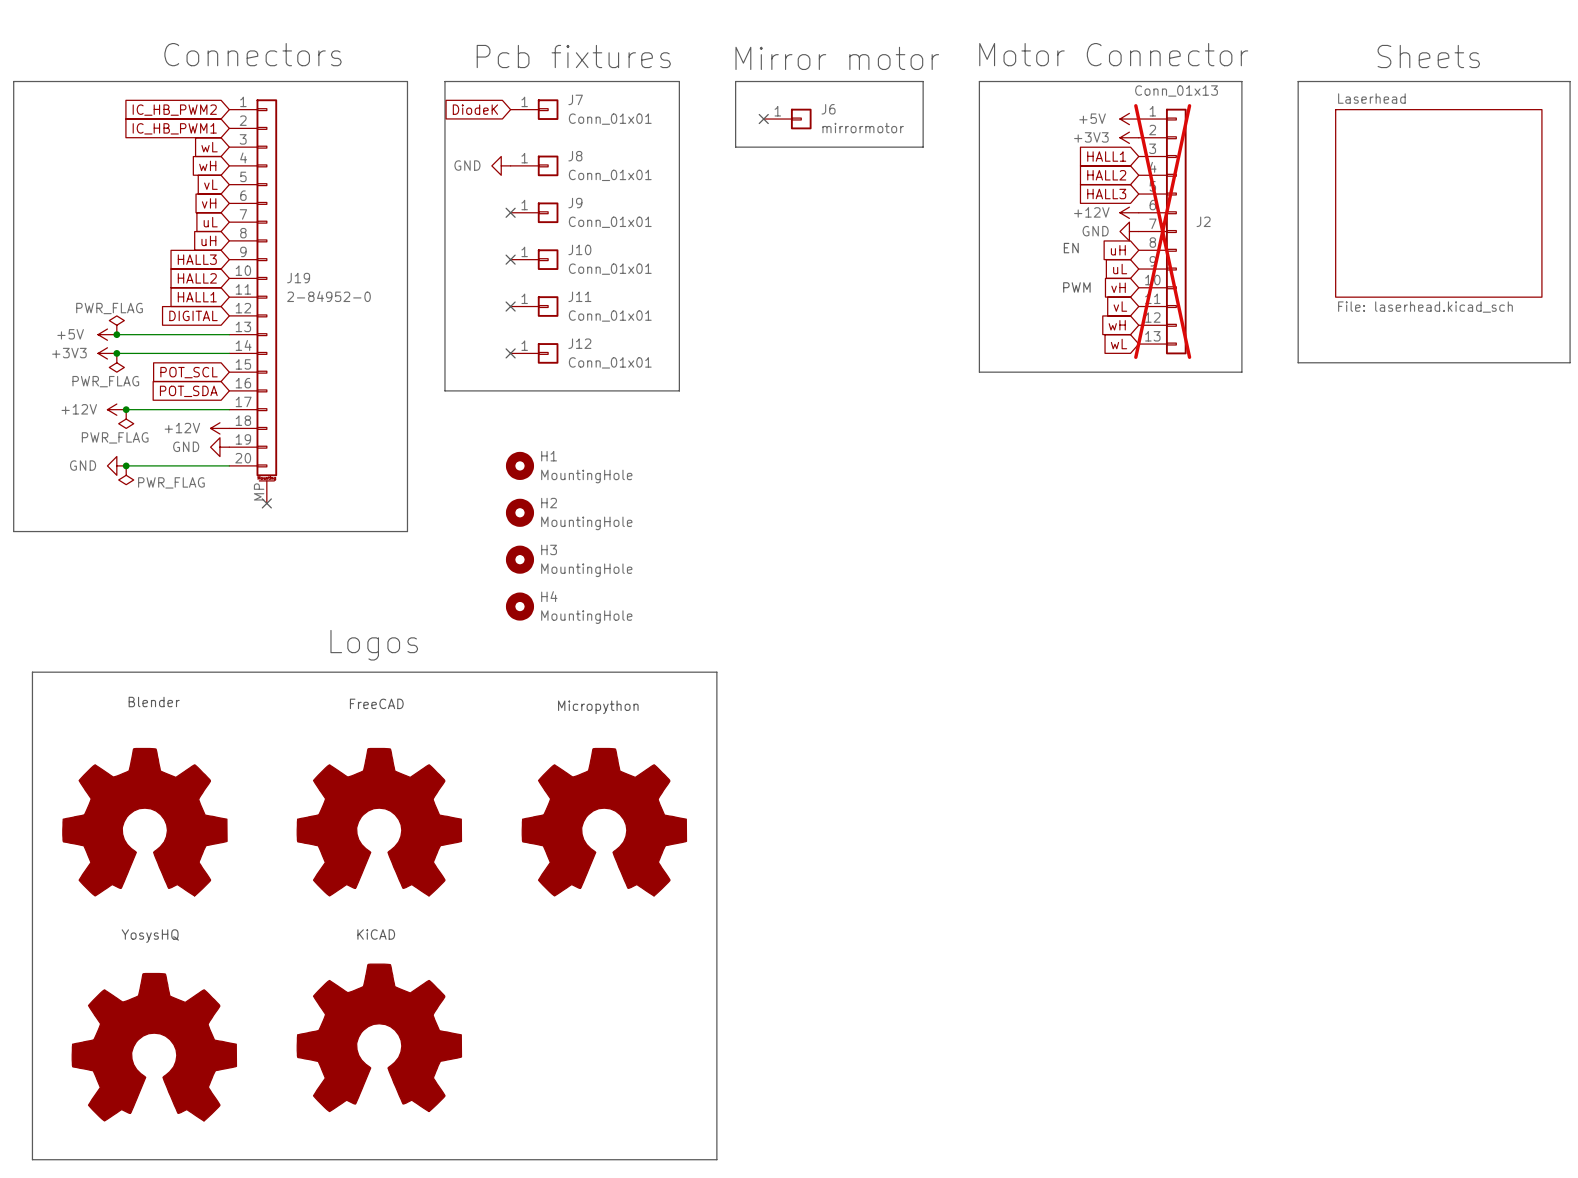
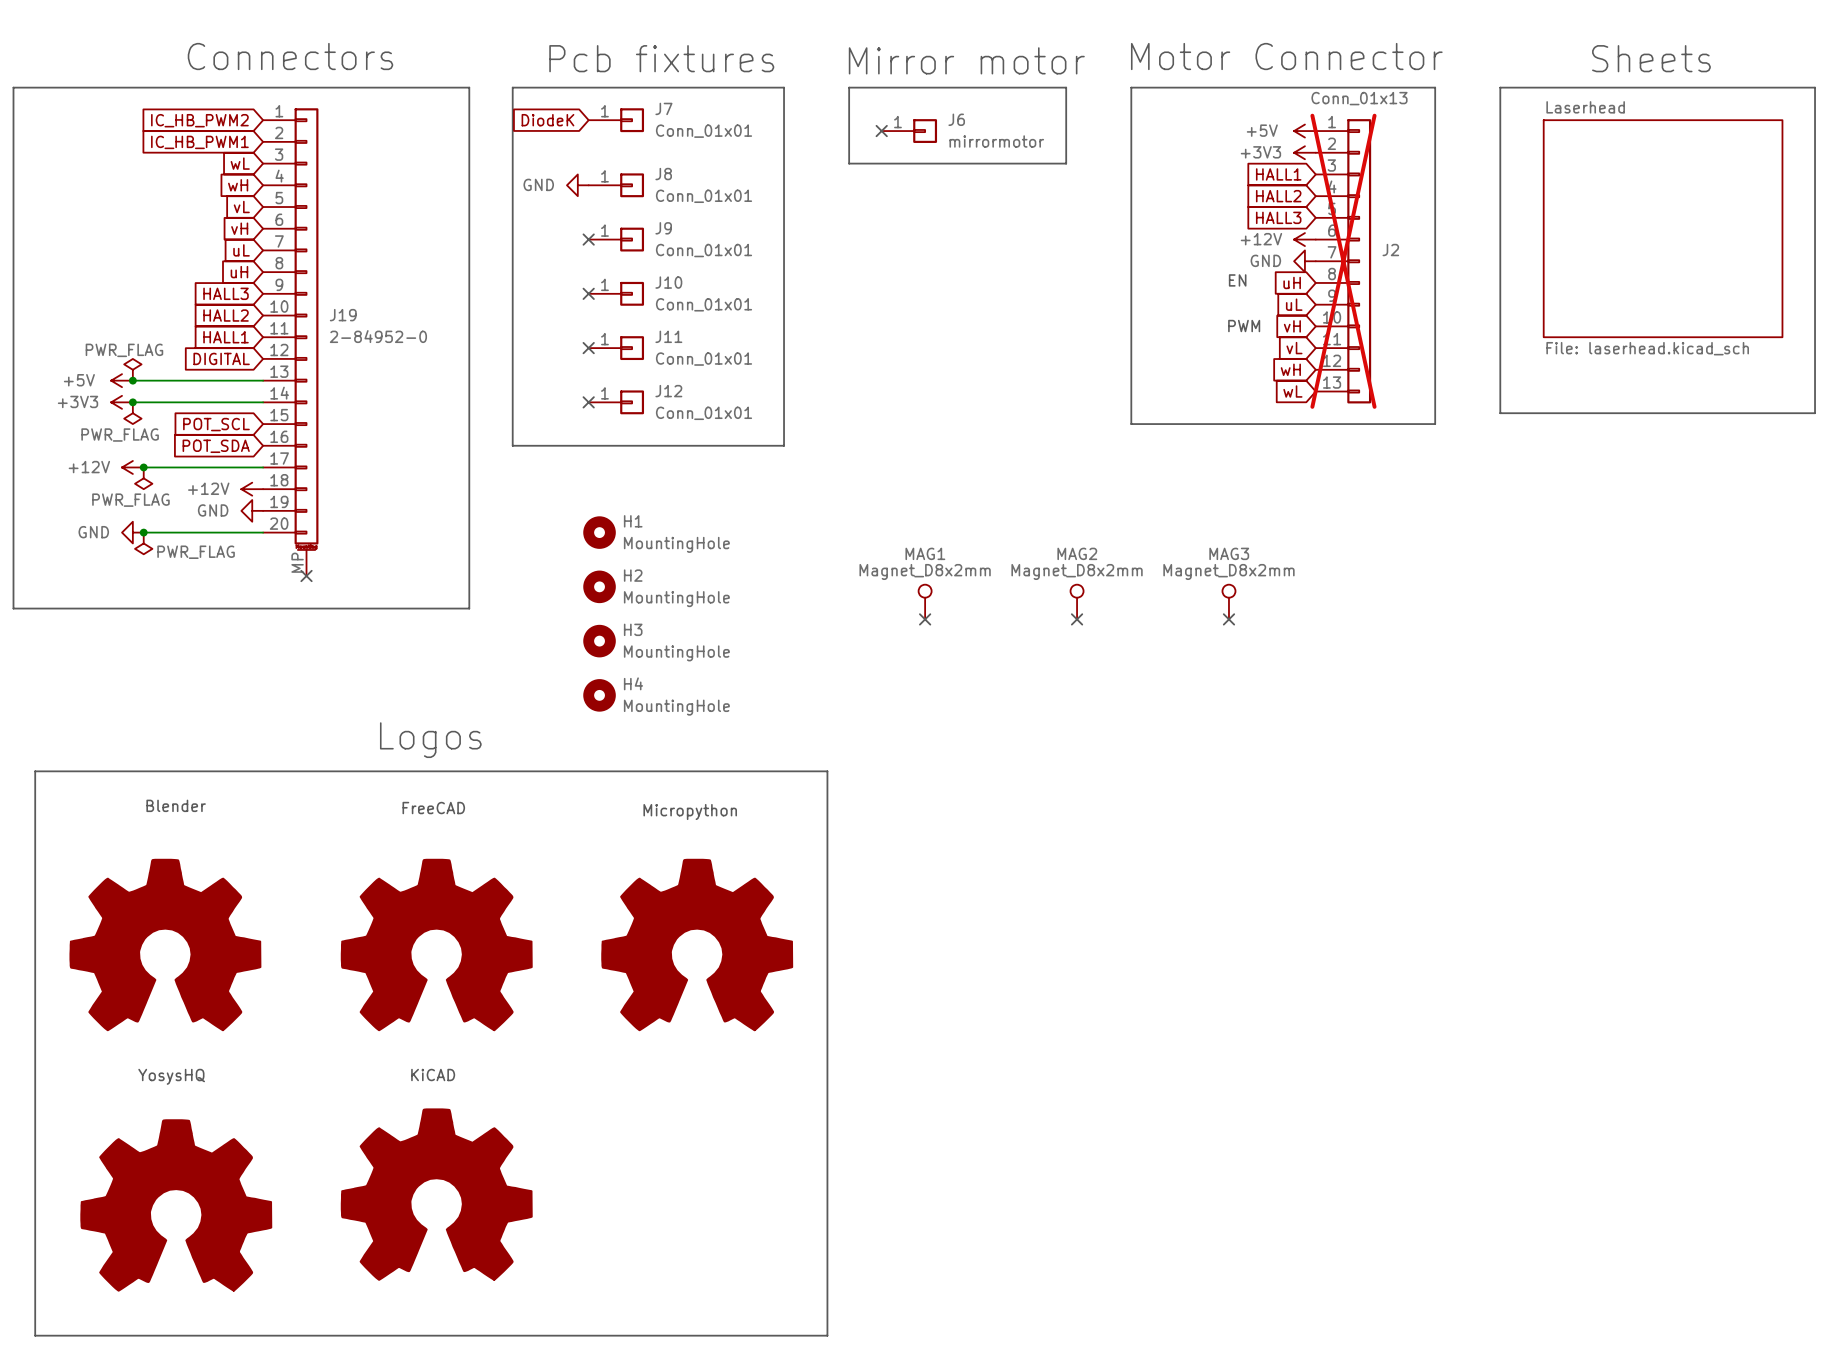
MAG1: none -> Magnet_D8x2mm (925, 602)
MAG2: none -> Magnet_D8x2mm (1077, 602)
MAG3: none -> Magnet_D8x2mm (1228, 602)
no-connect mark: none -> (925, 619)
no-connect mark: none -> (1077, 619)
no-connect mark: none -> (1228, 619)

